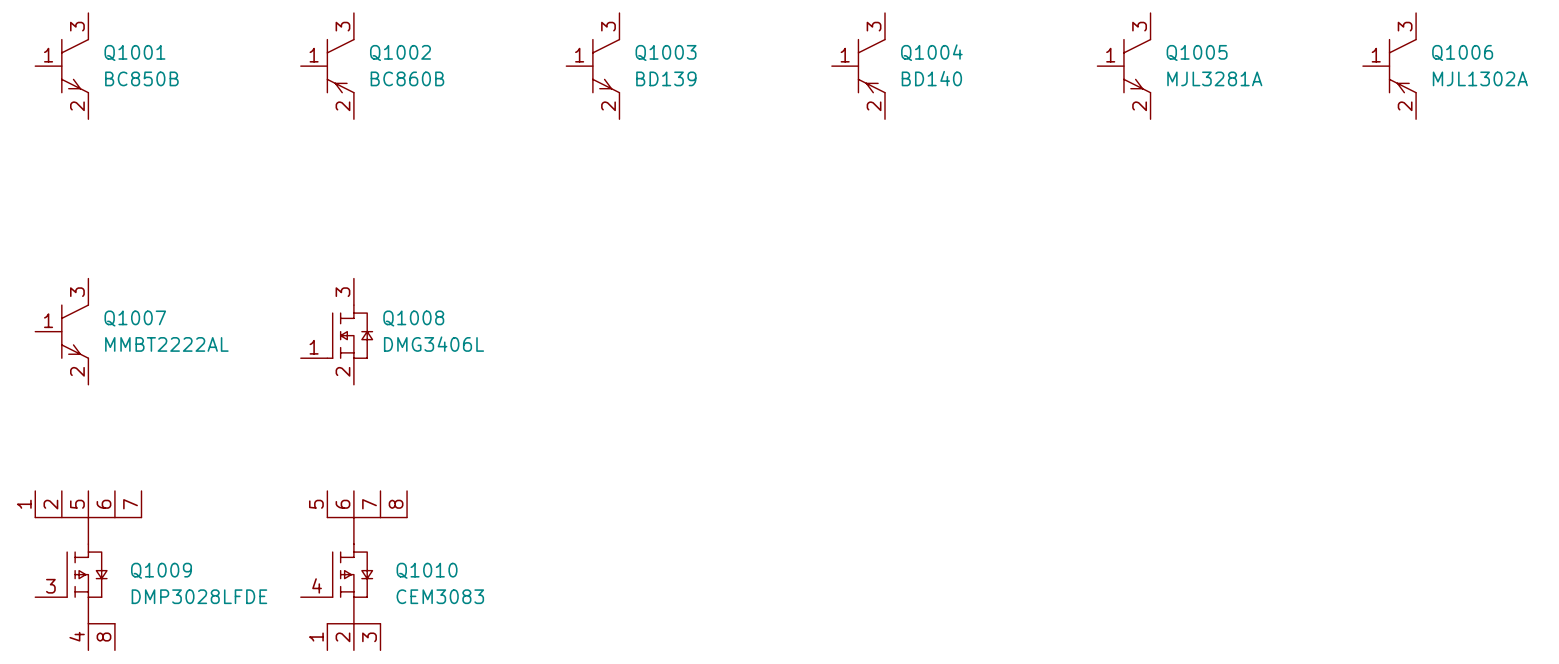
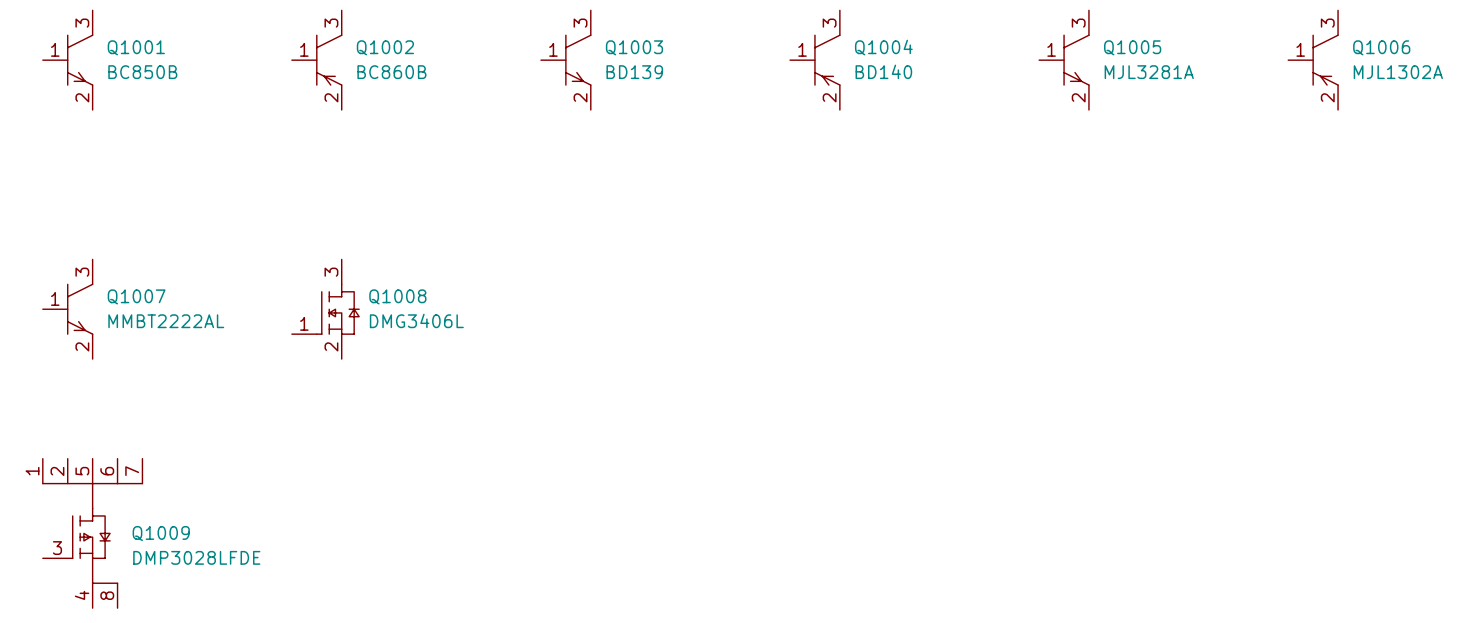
Q1010: CEM3083 (353, 570) -> none

